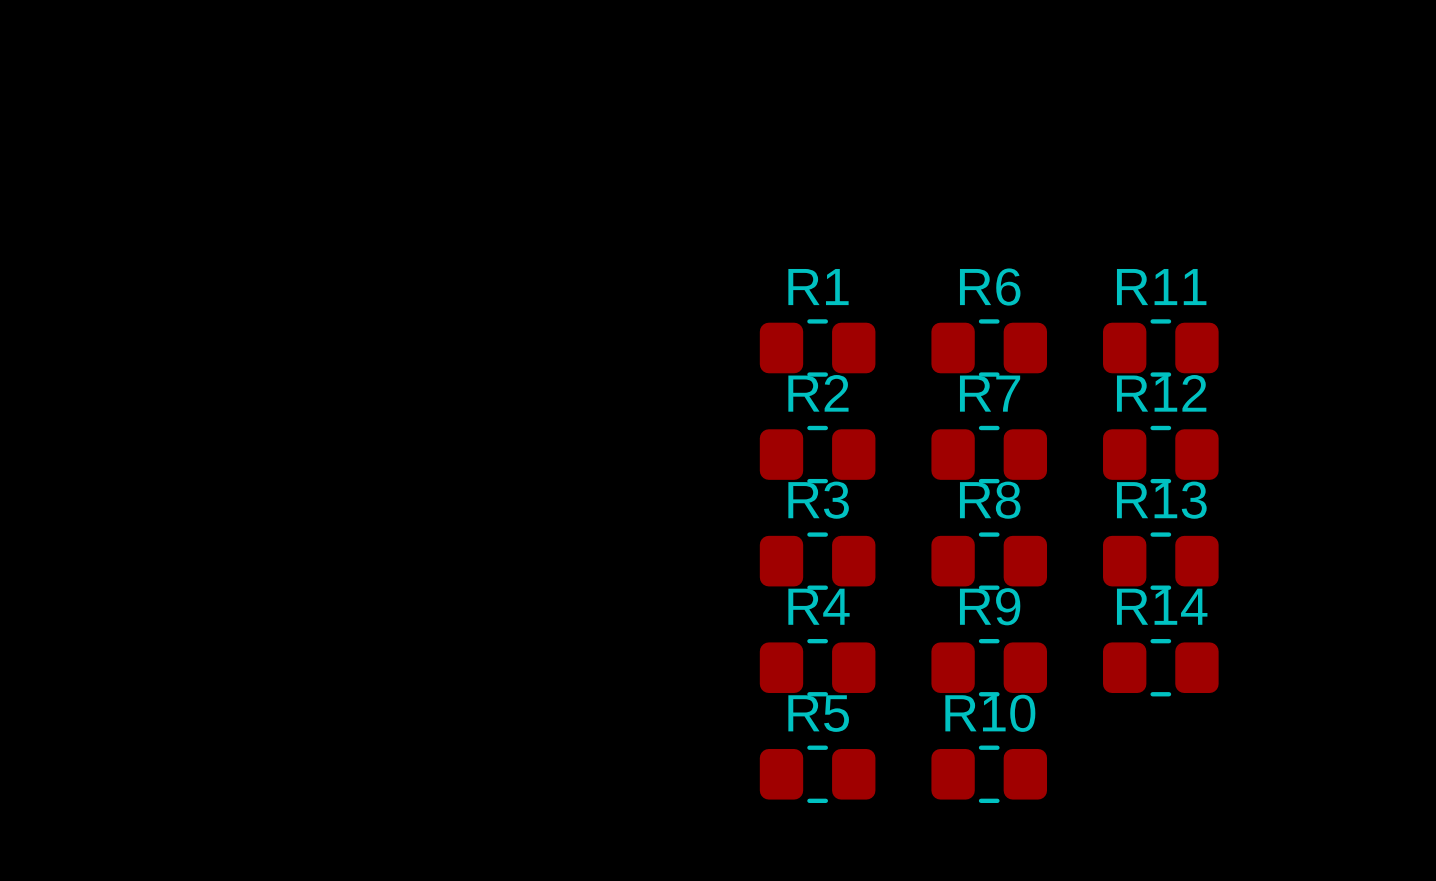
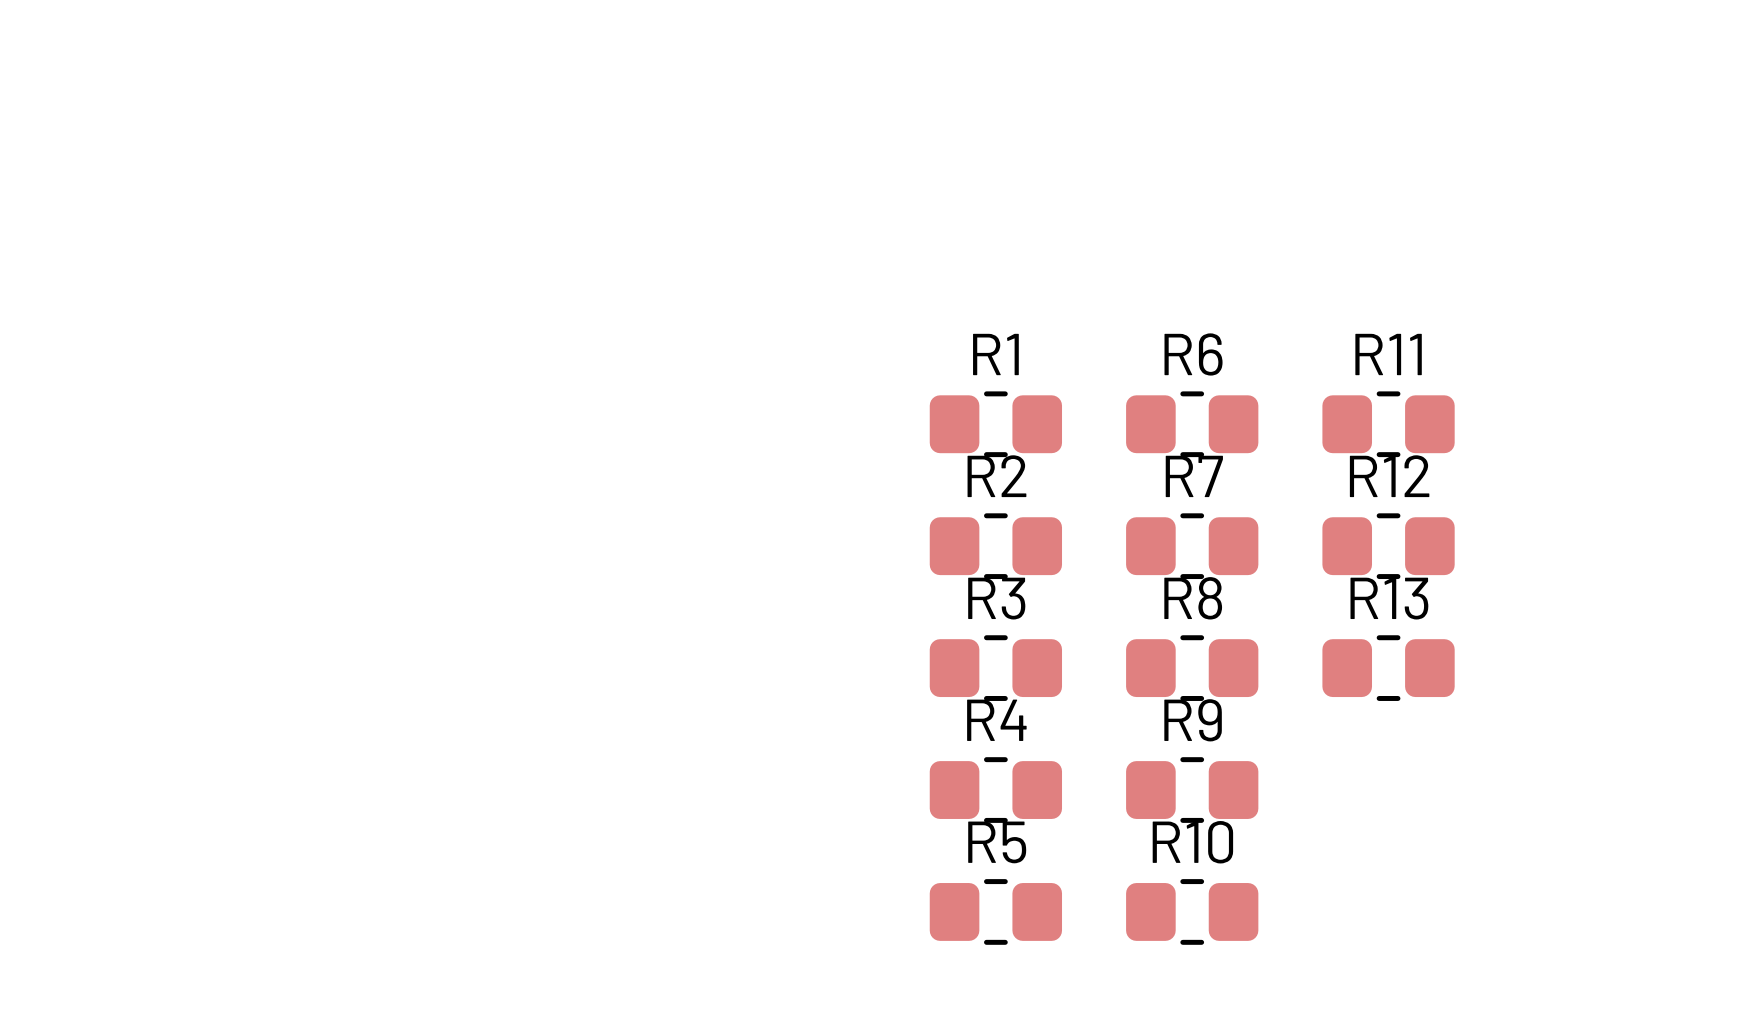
R14: (1160, 667) -> none

